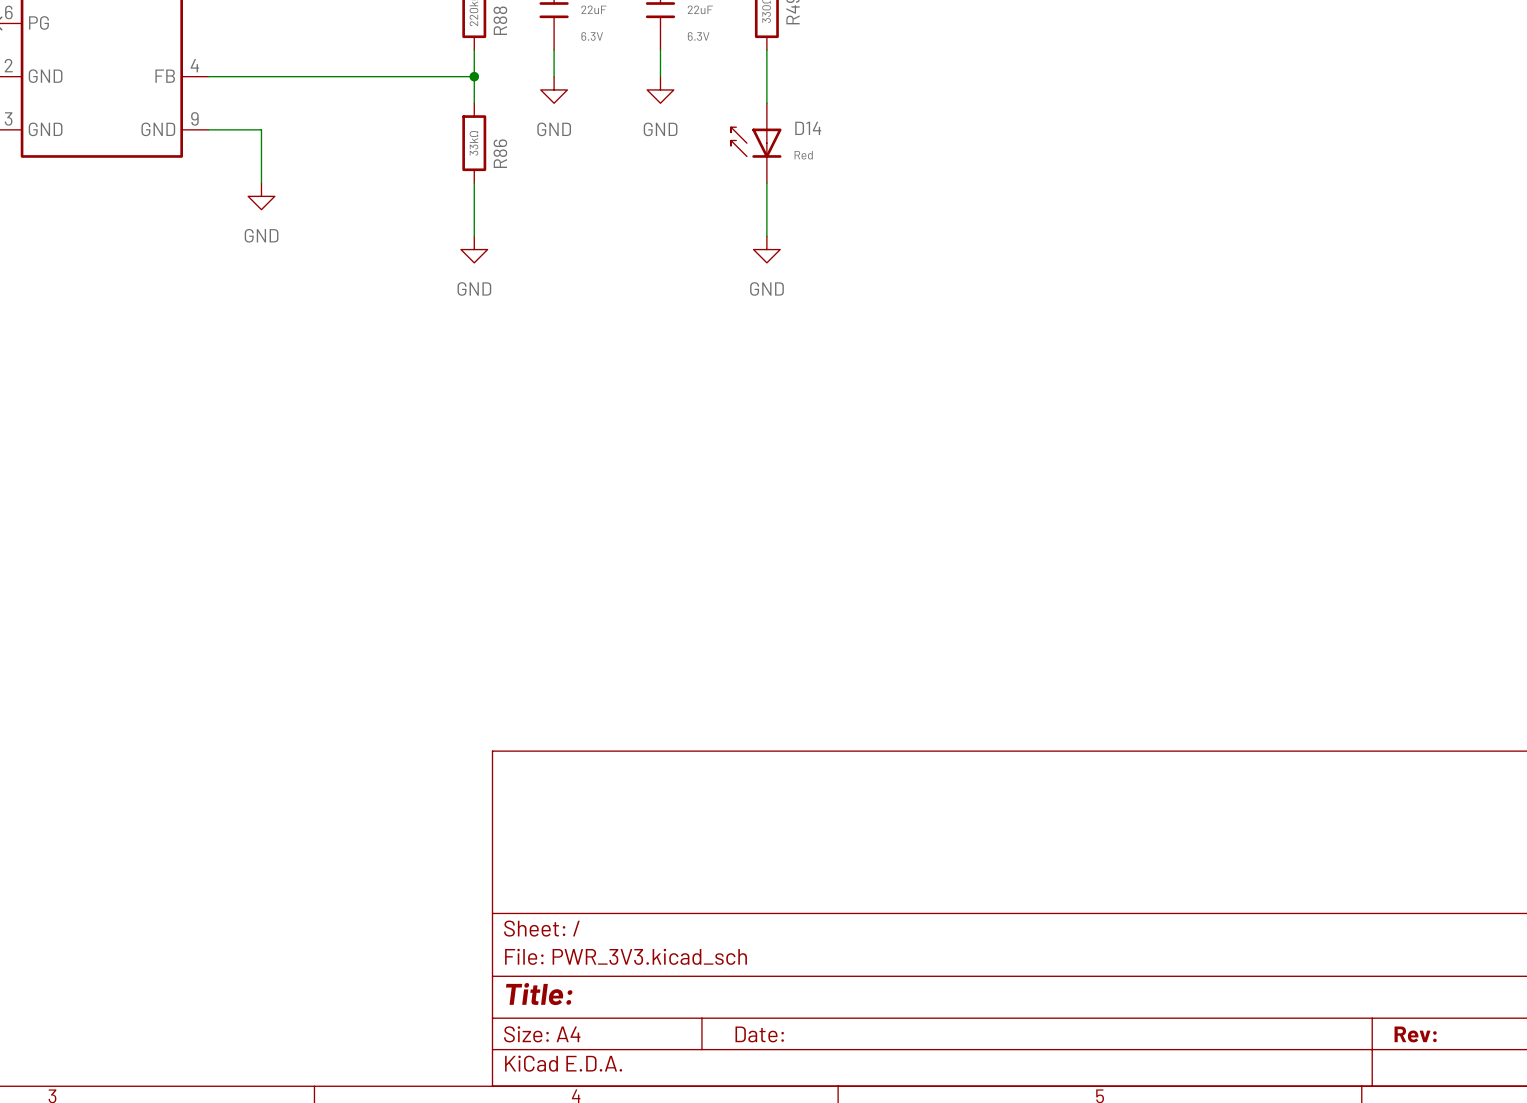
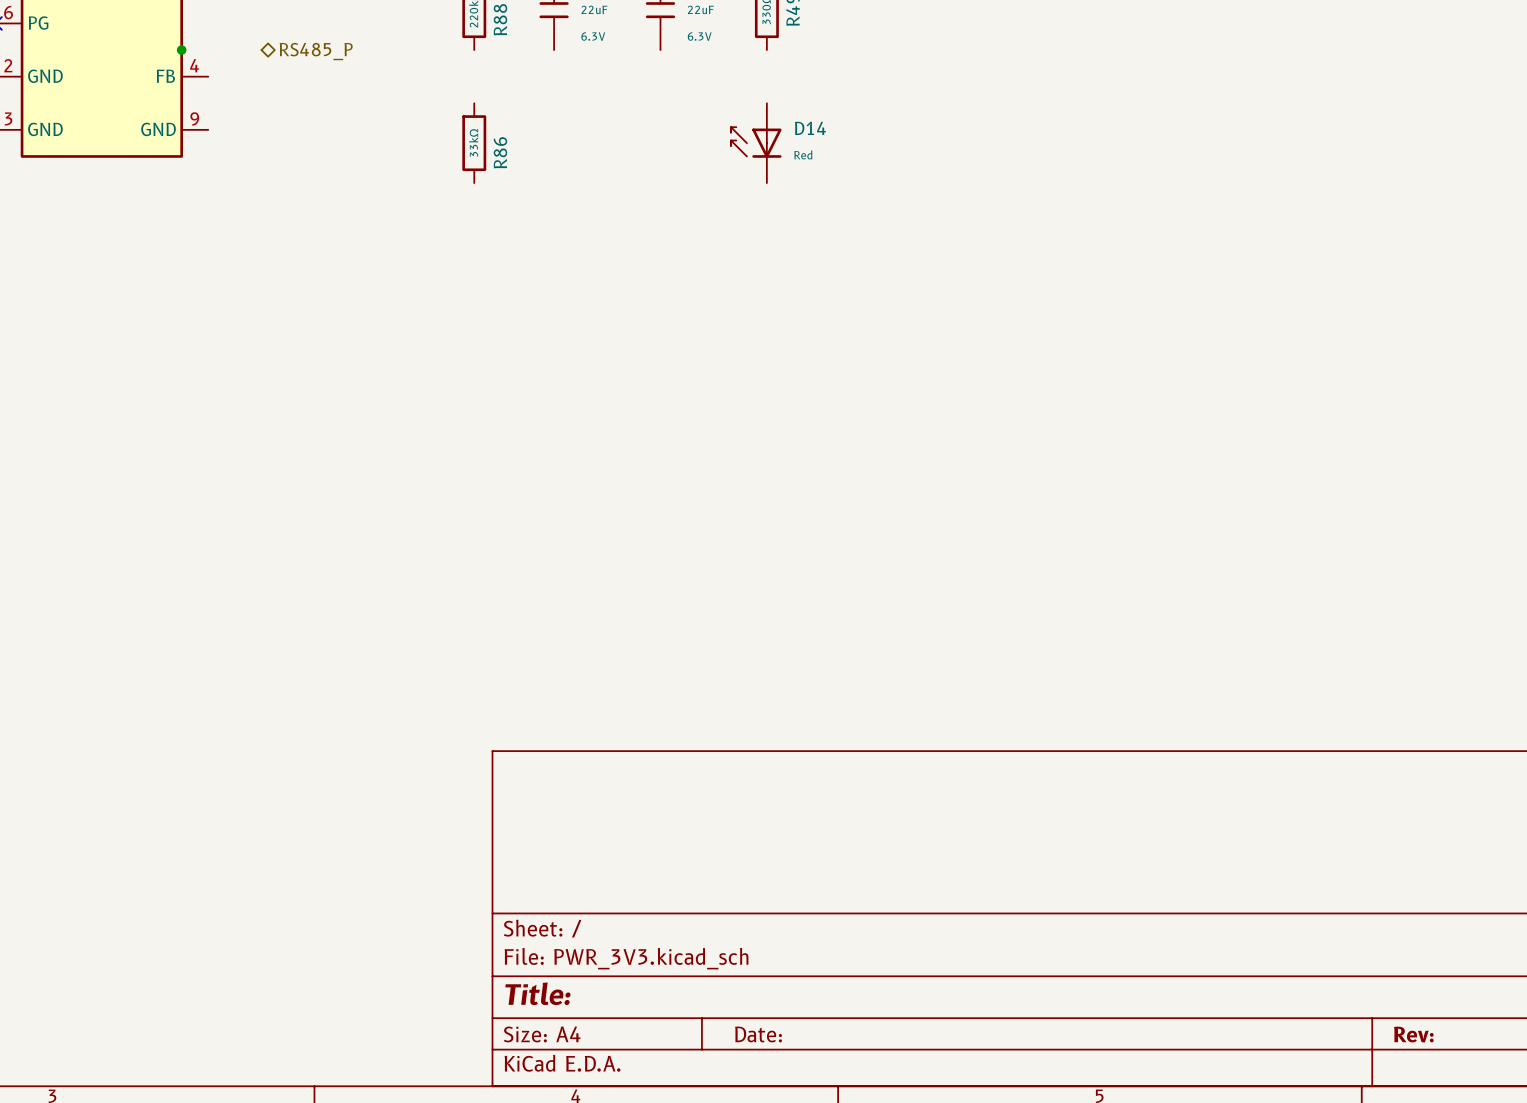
hierarchical label: none -> RS485_P (316, 51)
junction: none -> (181, 50)
wire: (474, 50) (474, 103) -> none
wire: (554, 50) (554, 76) -> none
wire: (660, 50) (660, 76) -> none
wire: (766, 50) (766, 103) -> none
wire: (208, 76) (474, 76) -> none
junction: (474, 76) -> none
power symbol: GND (554, 89) -> none
power symbol: GND (660, 89) -> none
wire: (208, 129) (261, 129) (261, 183) -> none
wire: (474, 183) (474, 236) -> none
wire: (766, 183) (766, 236) -> none
power symbol: GND (261, 196) -> none
power symbol: GND (474, 249) -> none
power symbol: GND (766, 249) -> none

